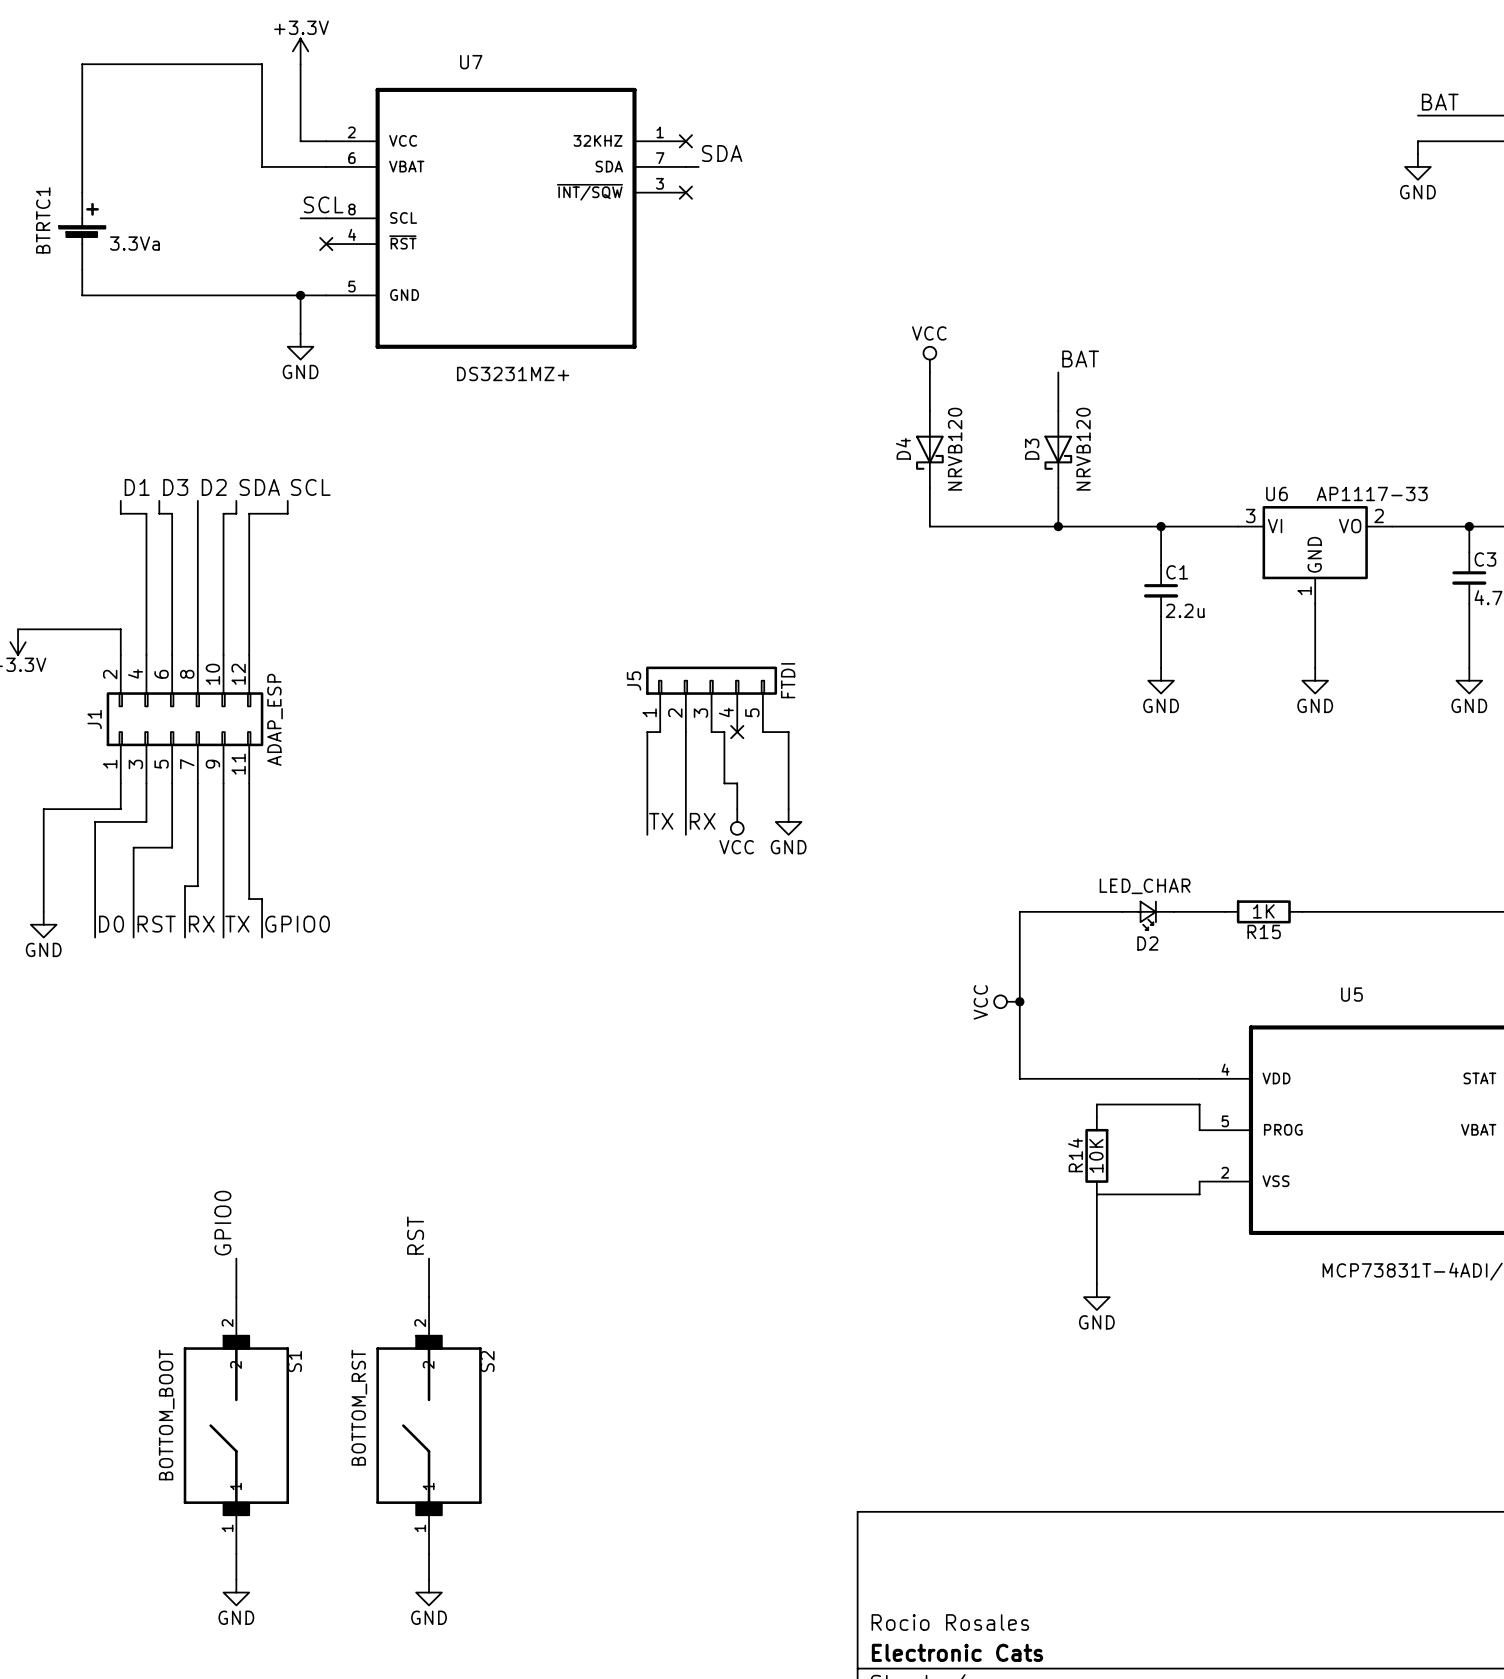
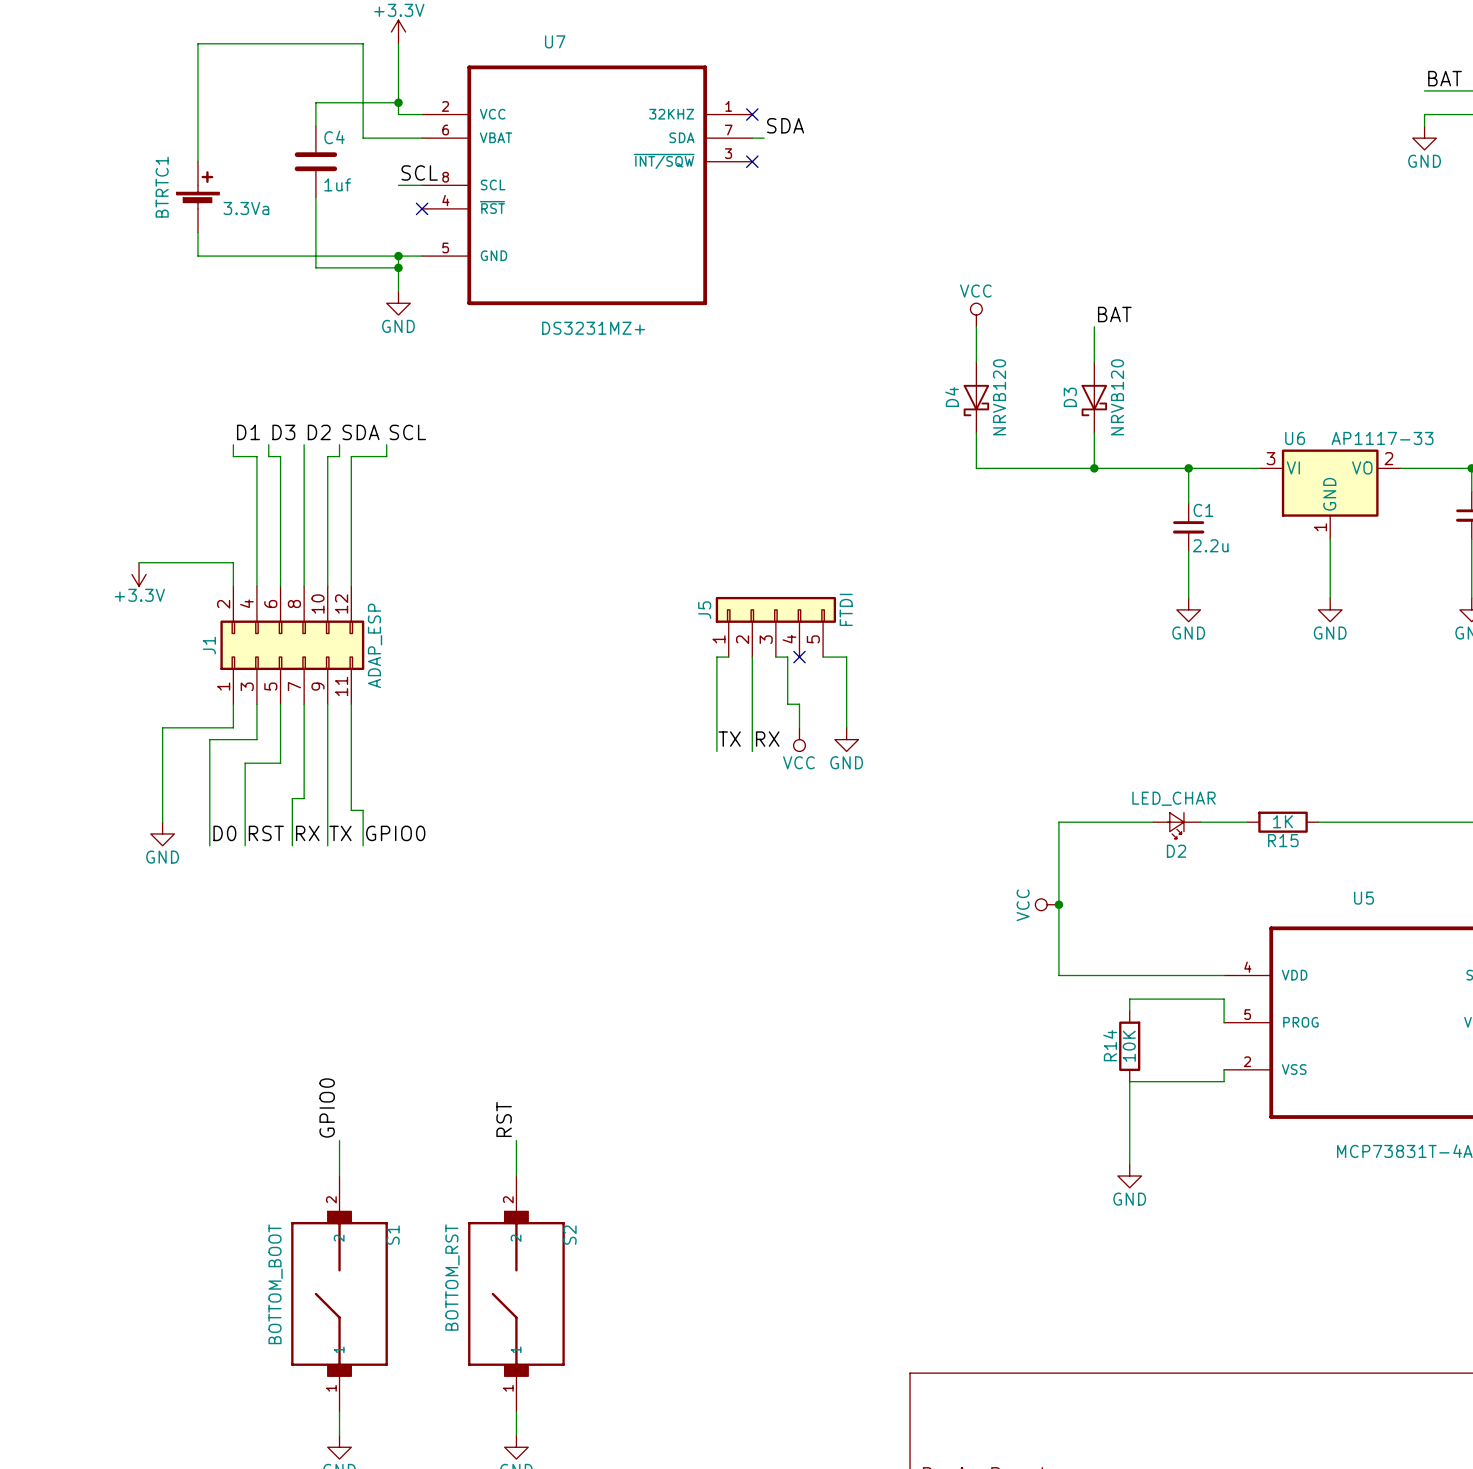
wire: none -> (398, 102) (315, 102) (315, 126)
junction: none -> (398, 102)
C4: none -> 1uf (315, 161)
wire: none -> (315, 197) (315, 267) (398, 267)
junction: none -> (398, 267)

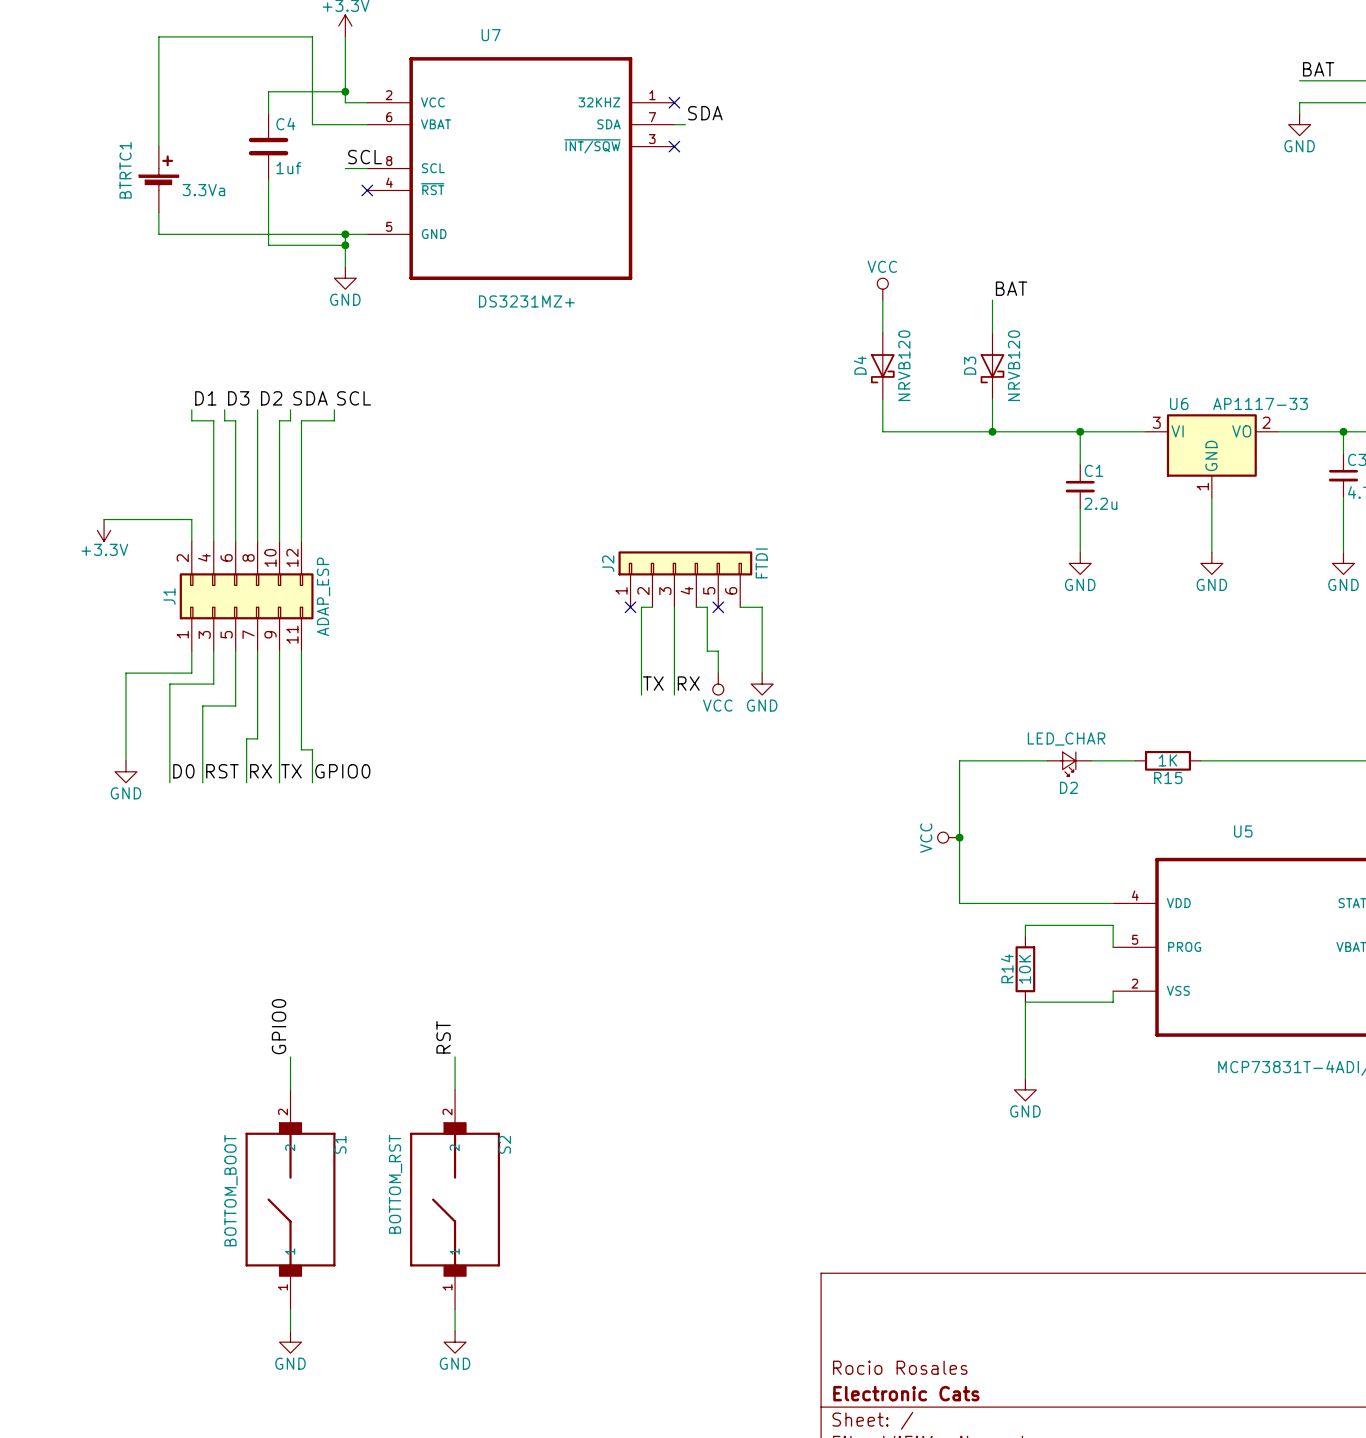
J2: none -> FTDI (685, 579)
J5: FTDI (775, 626) -> none
no-connect mark: none -> (630, 607)

